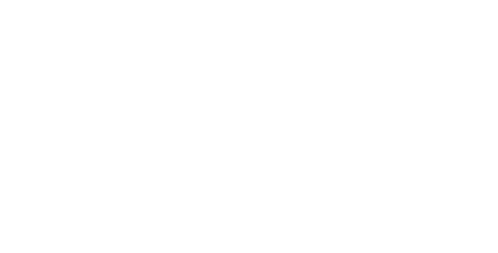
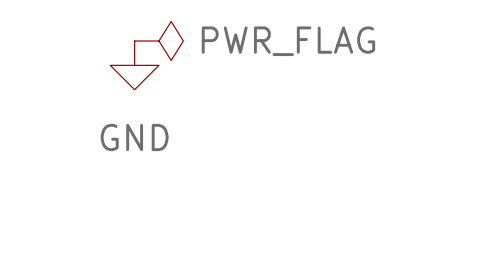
power symbol: none -> PWR_FLAG (158, 41)
power symbol: none -> GND (134, 65)

